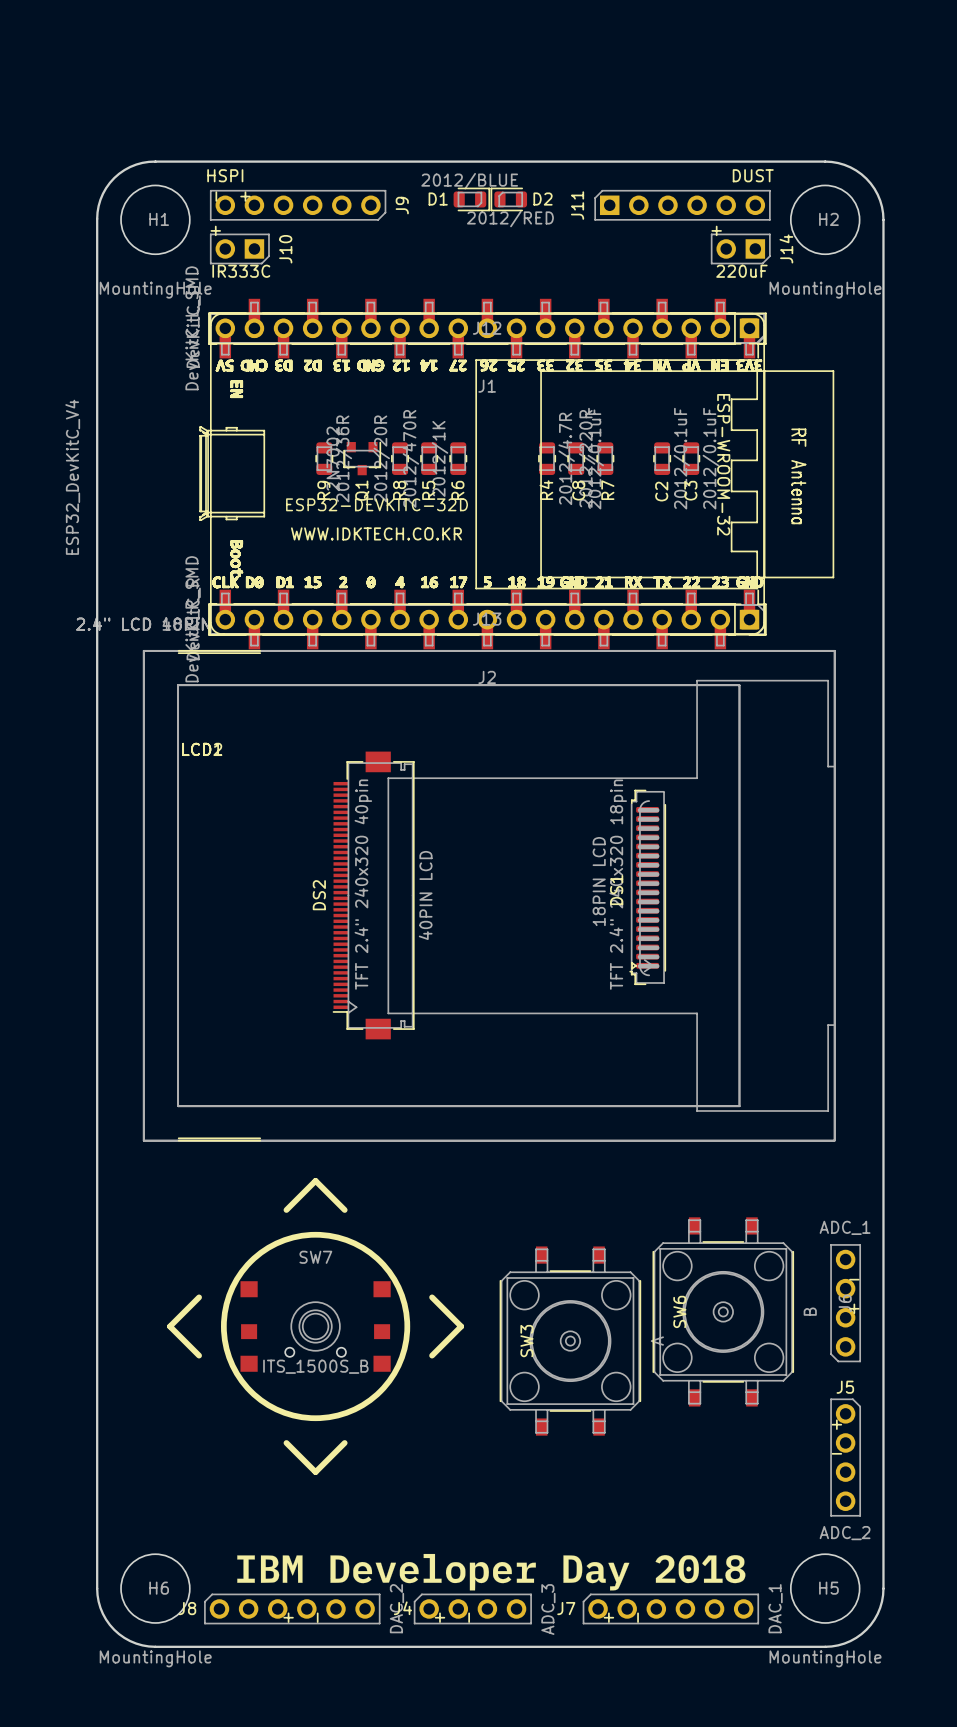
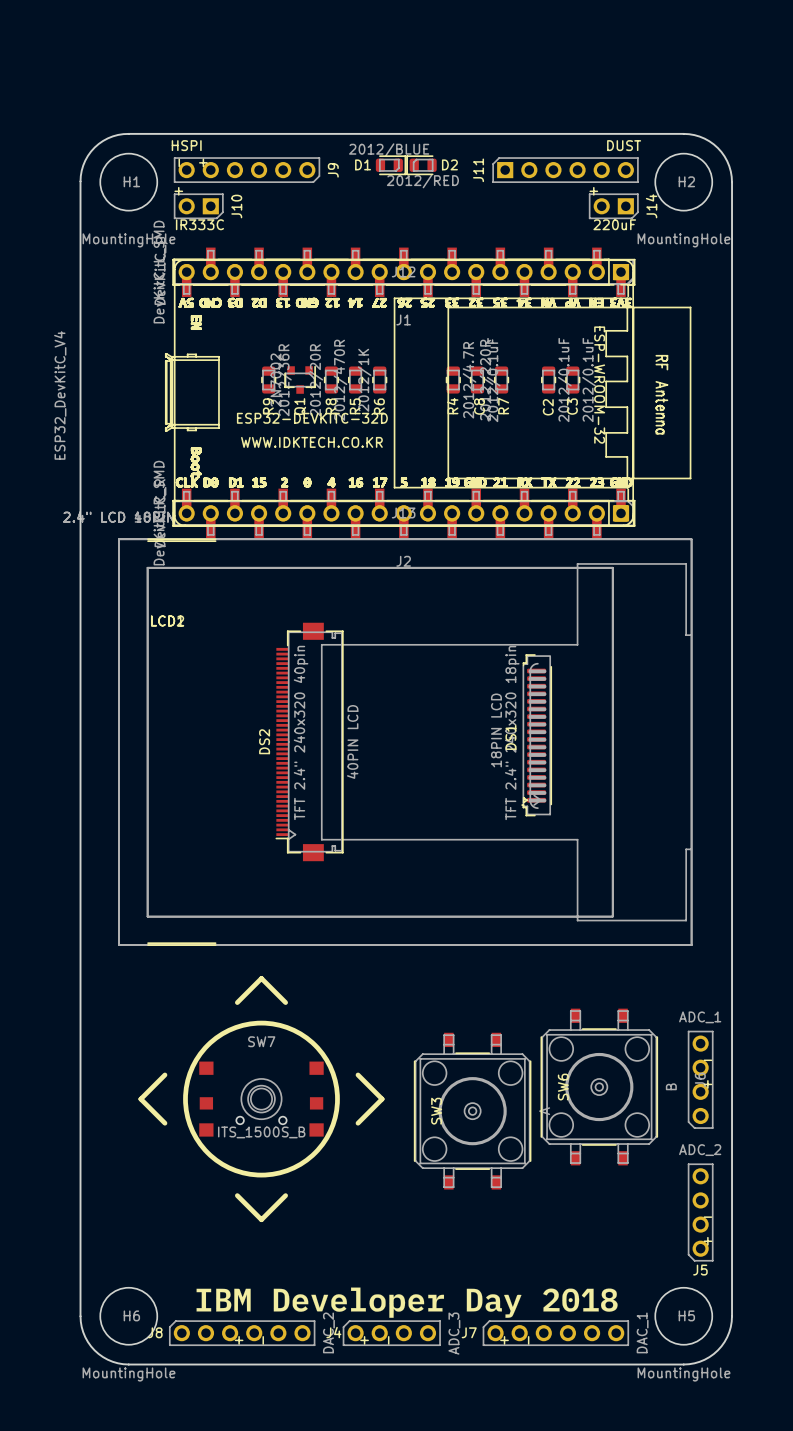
J5 rotation: 0° (845, 1457) -> 180° (700, 1212)

